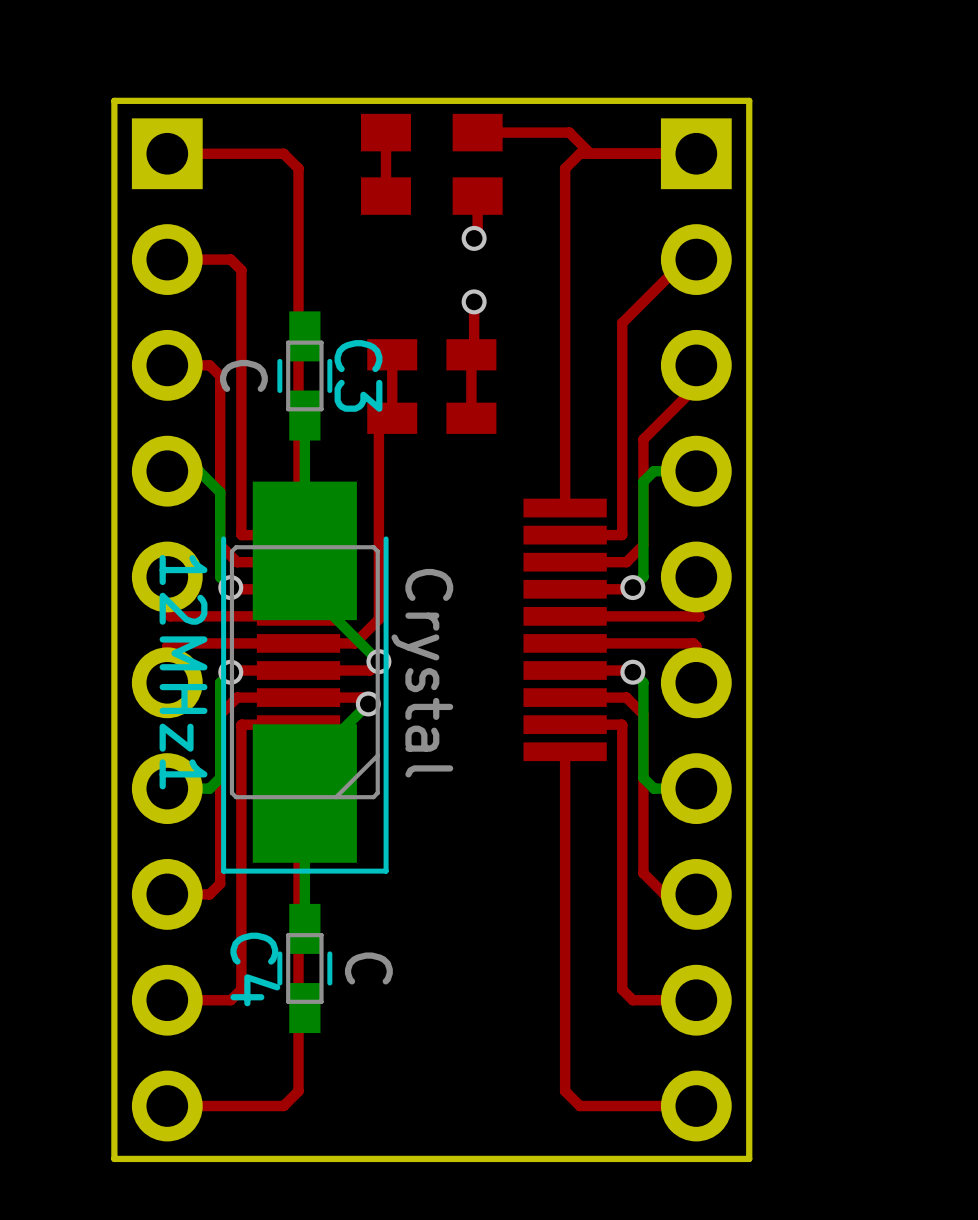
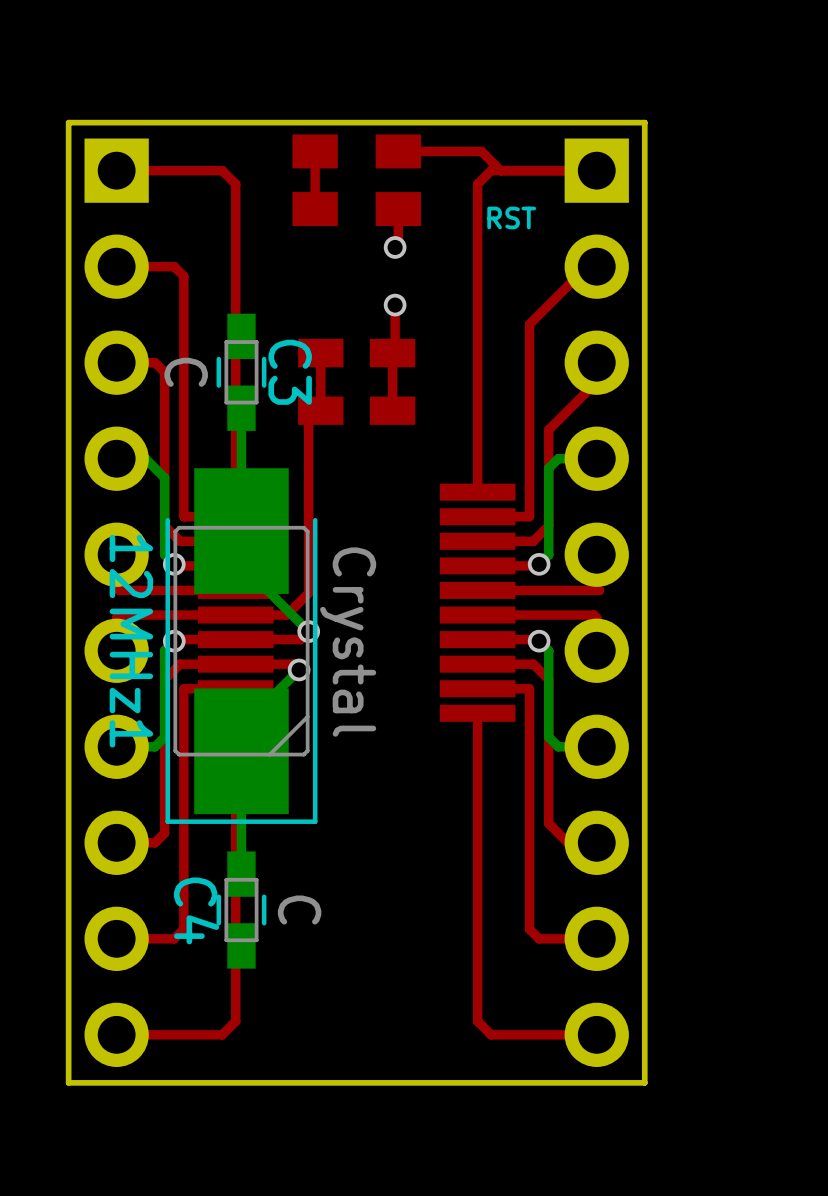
text: none -> RST (511, 217)

